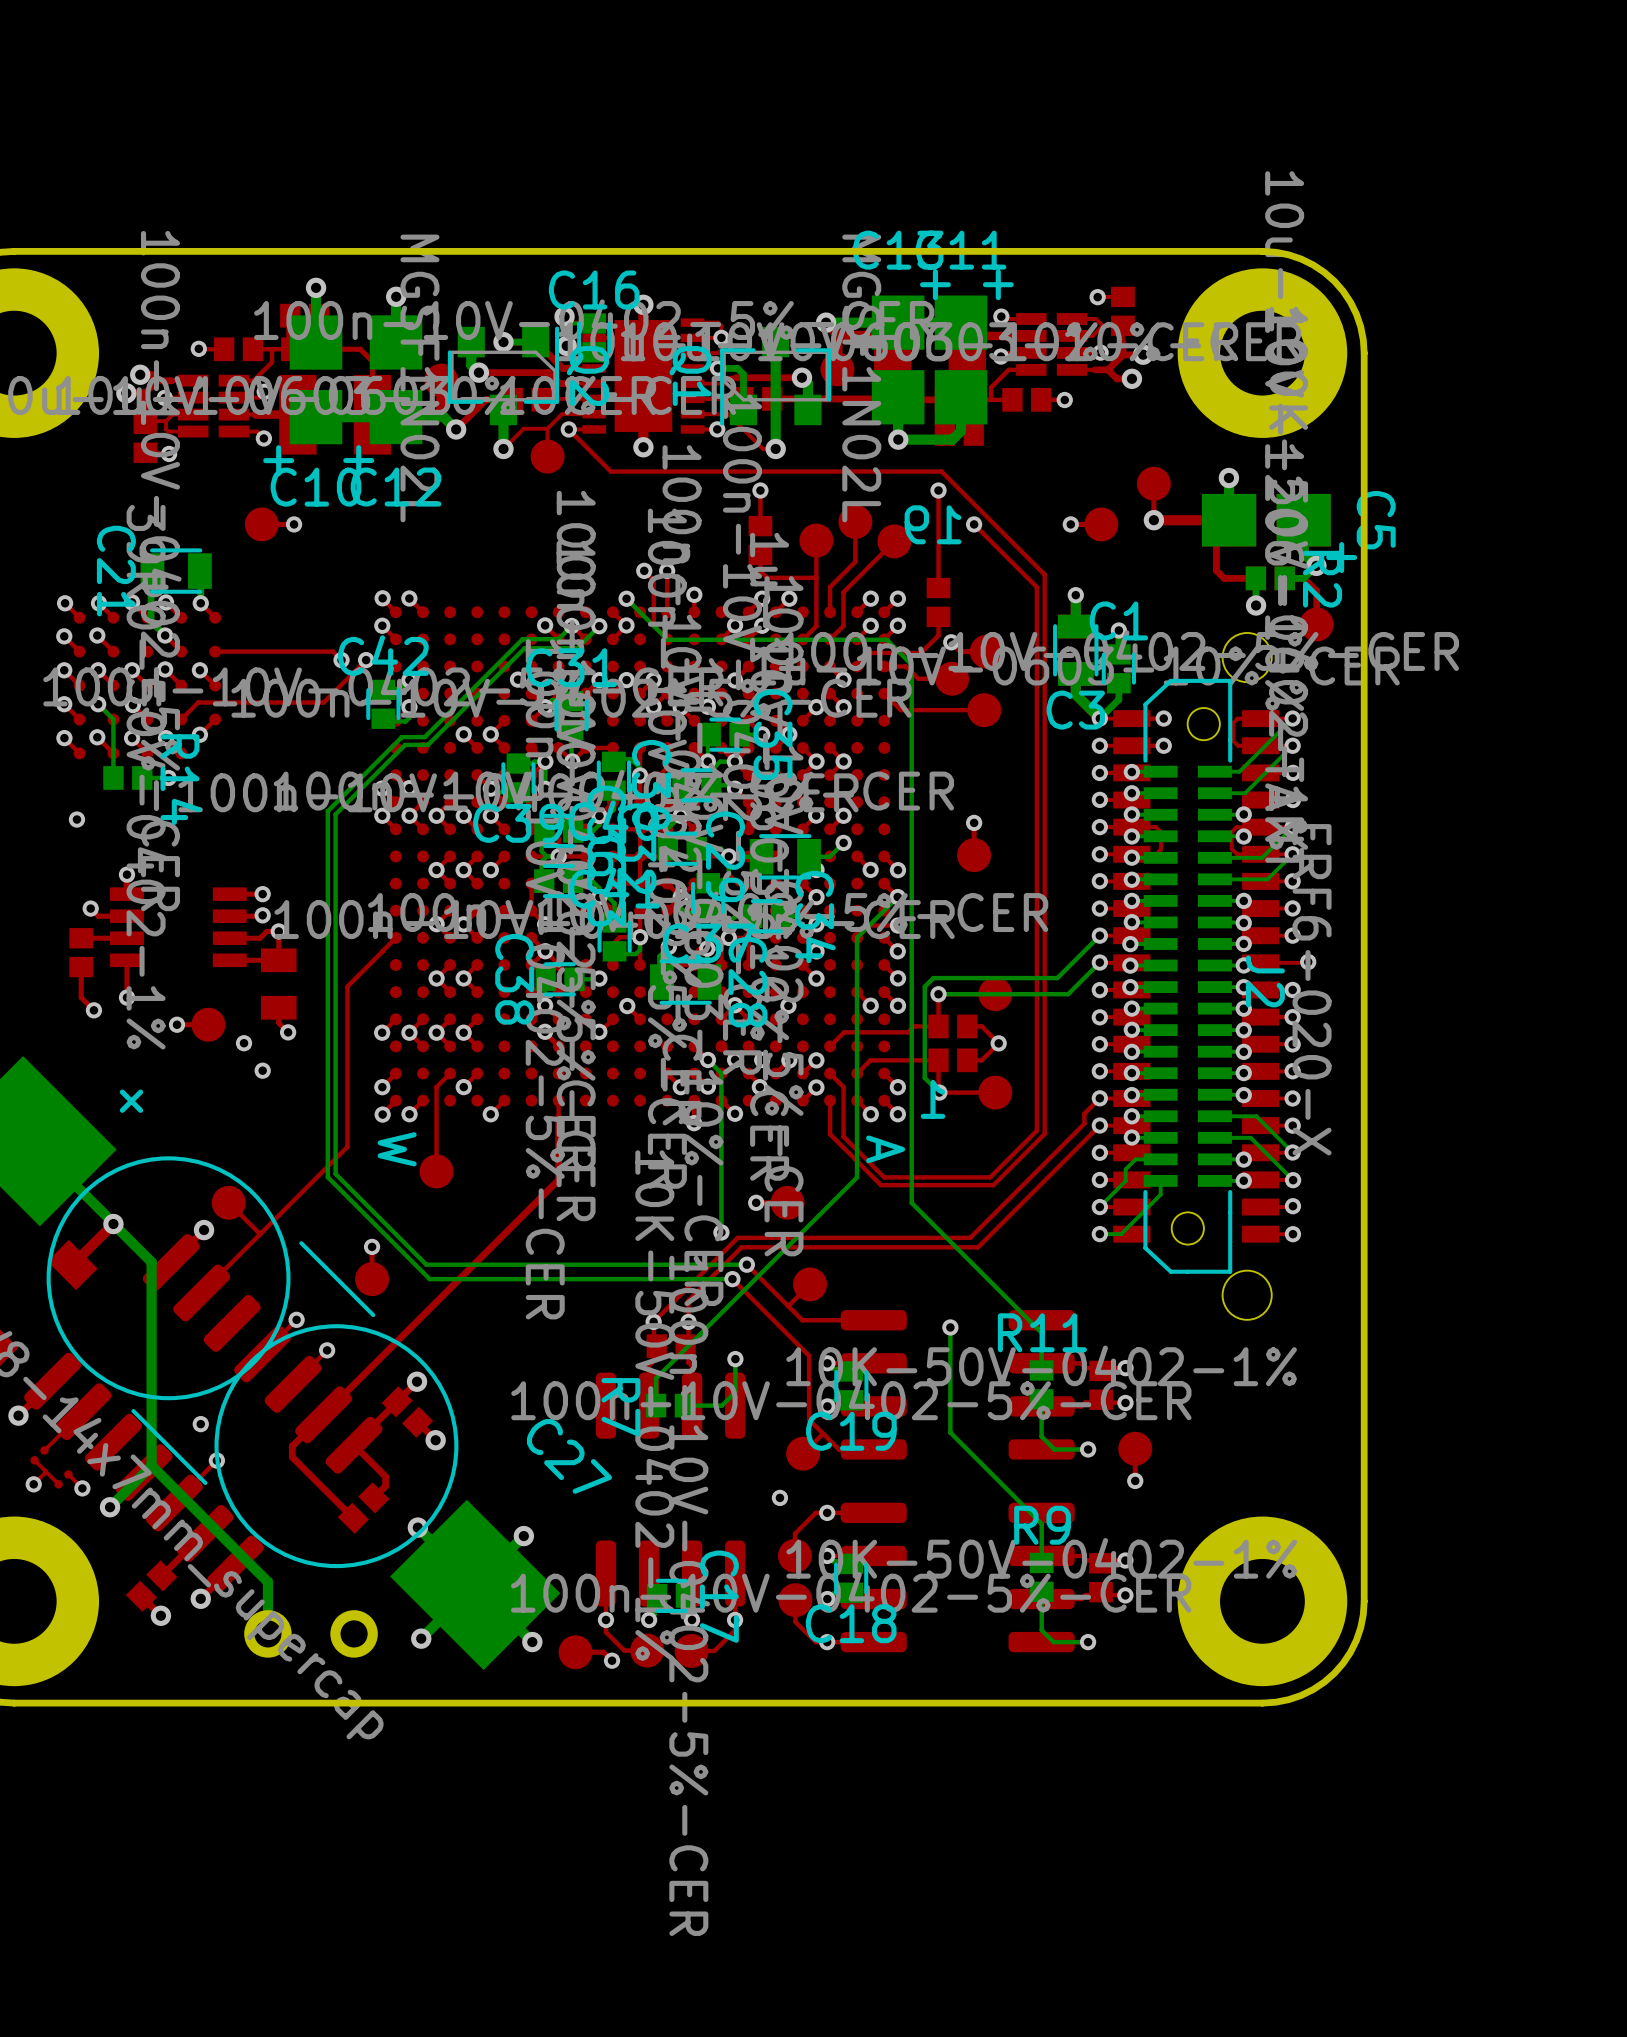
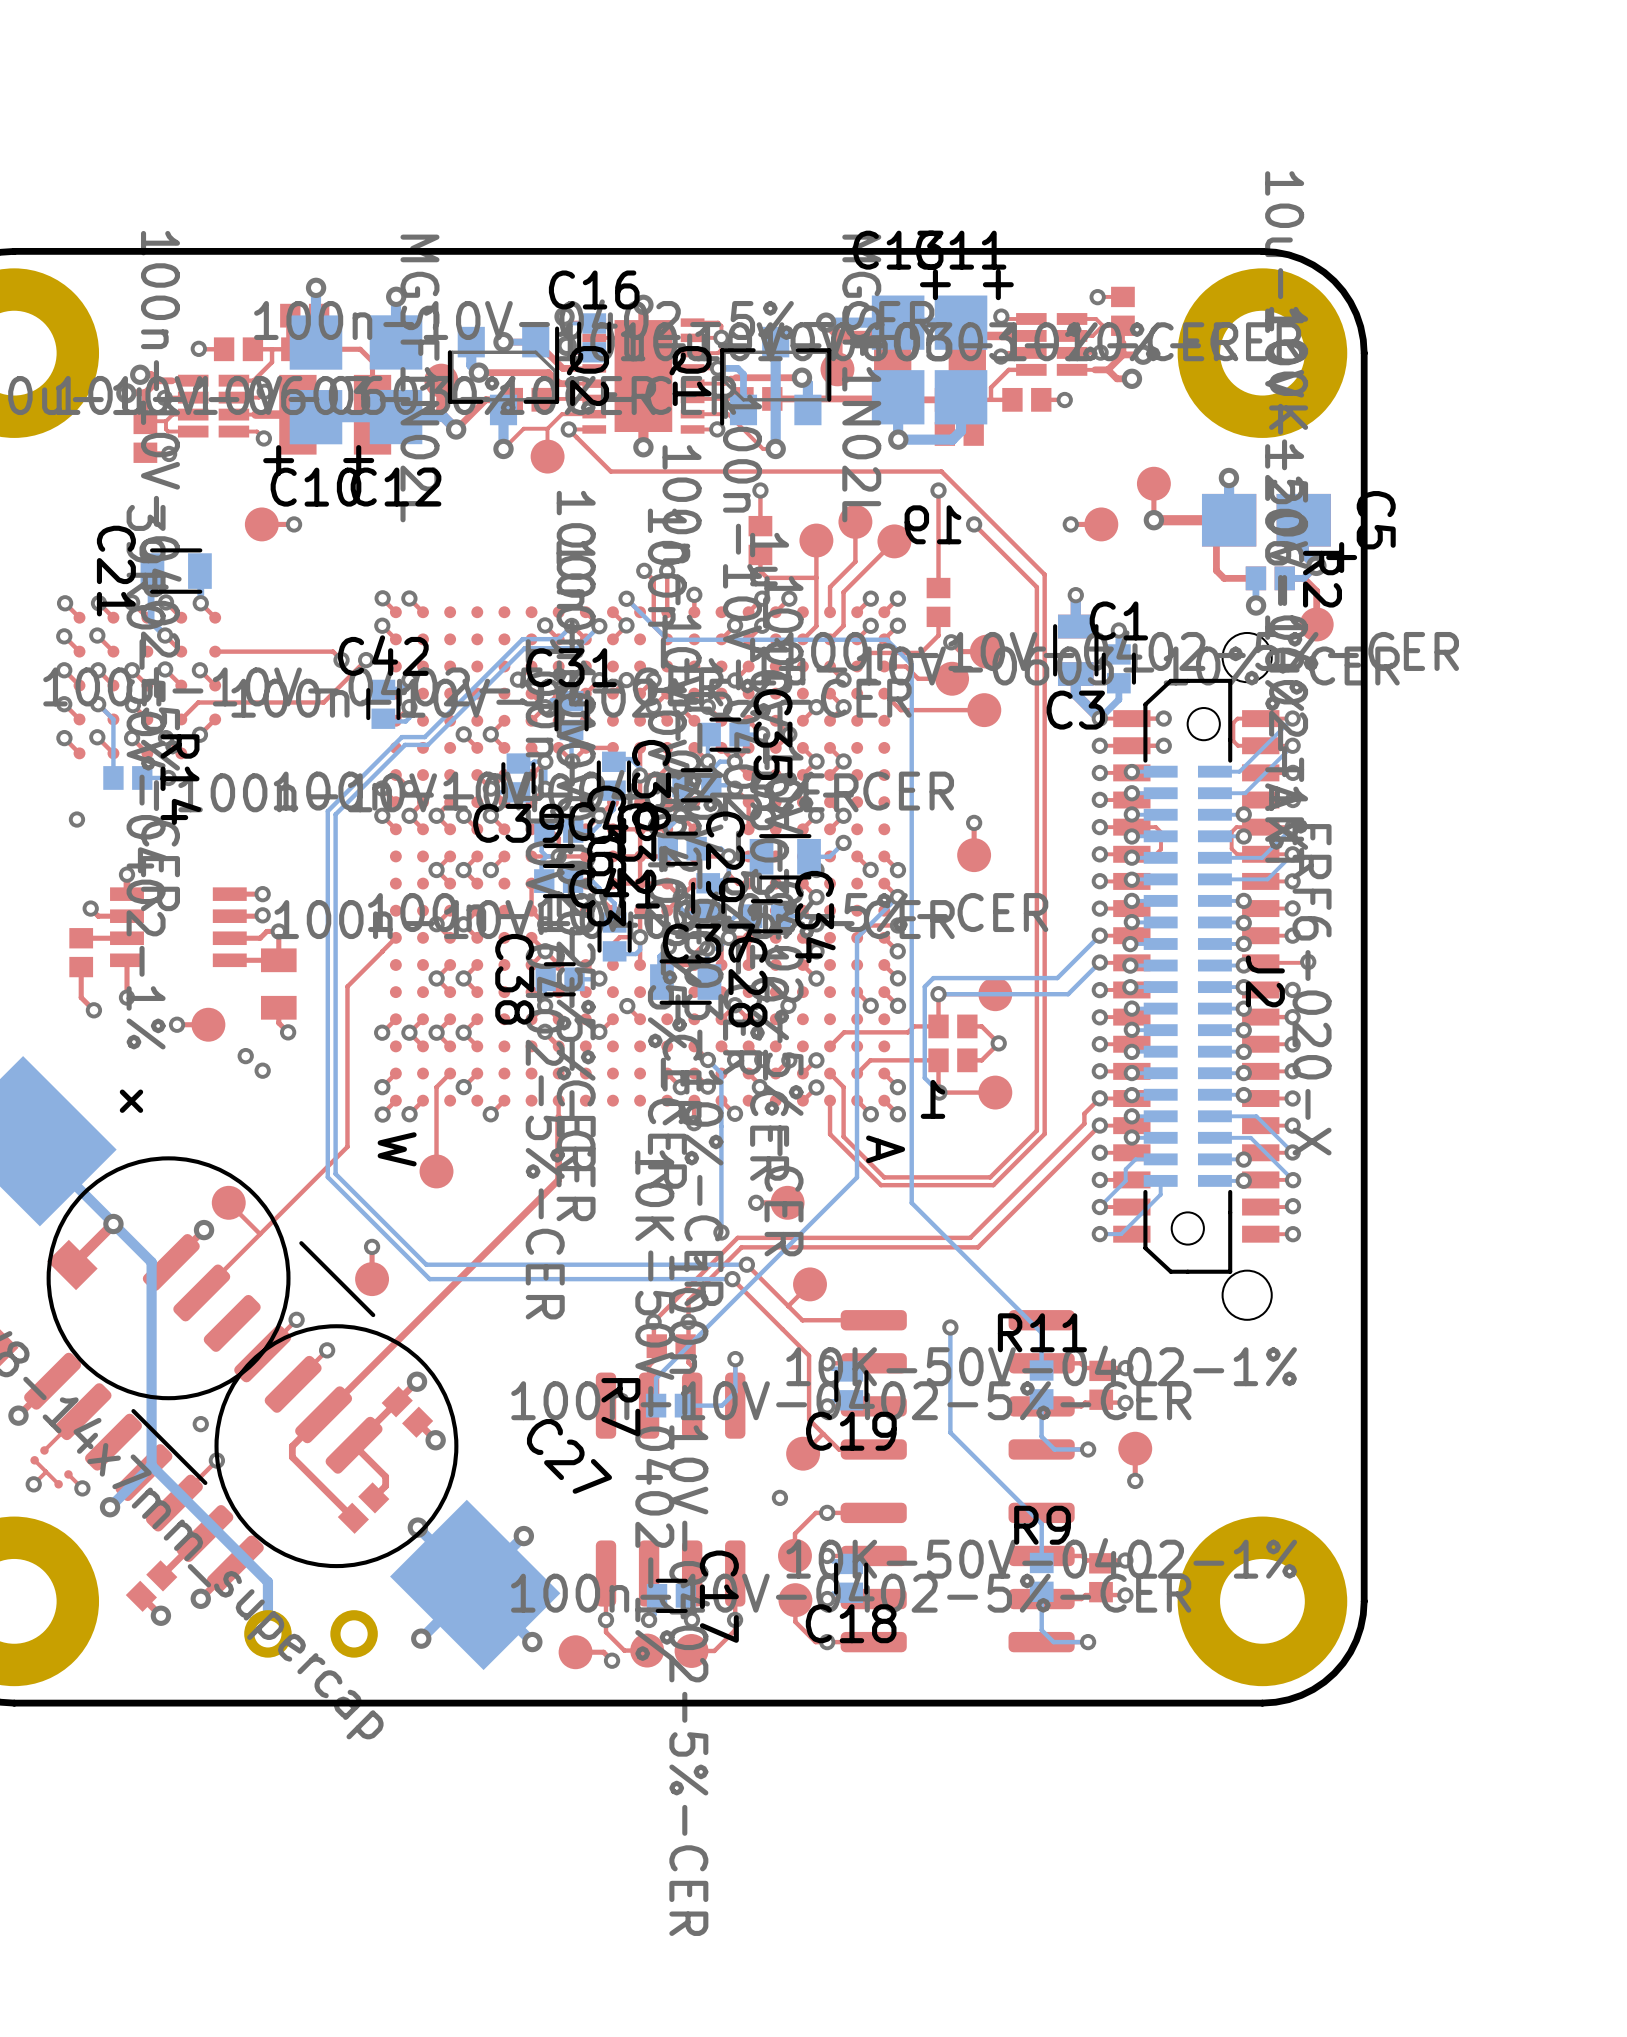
via position: (244, 1043) -> (245, 1056)

